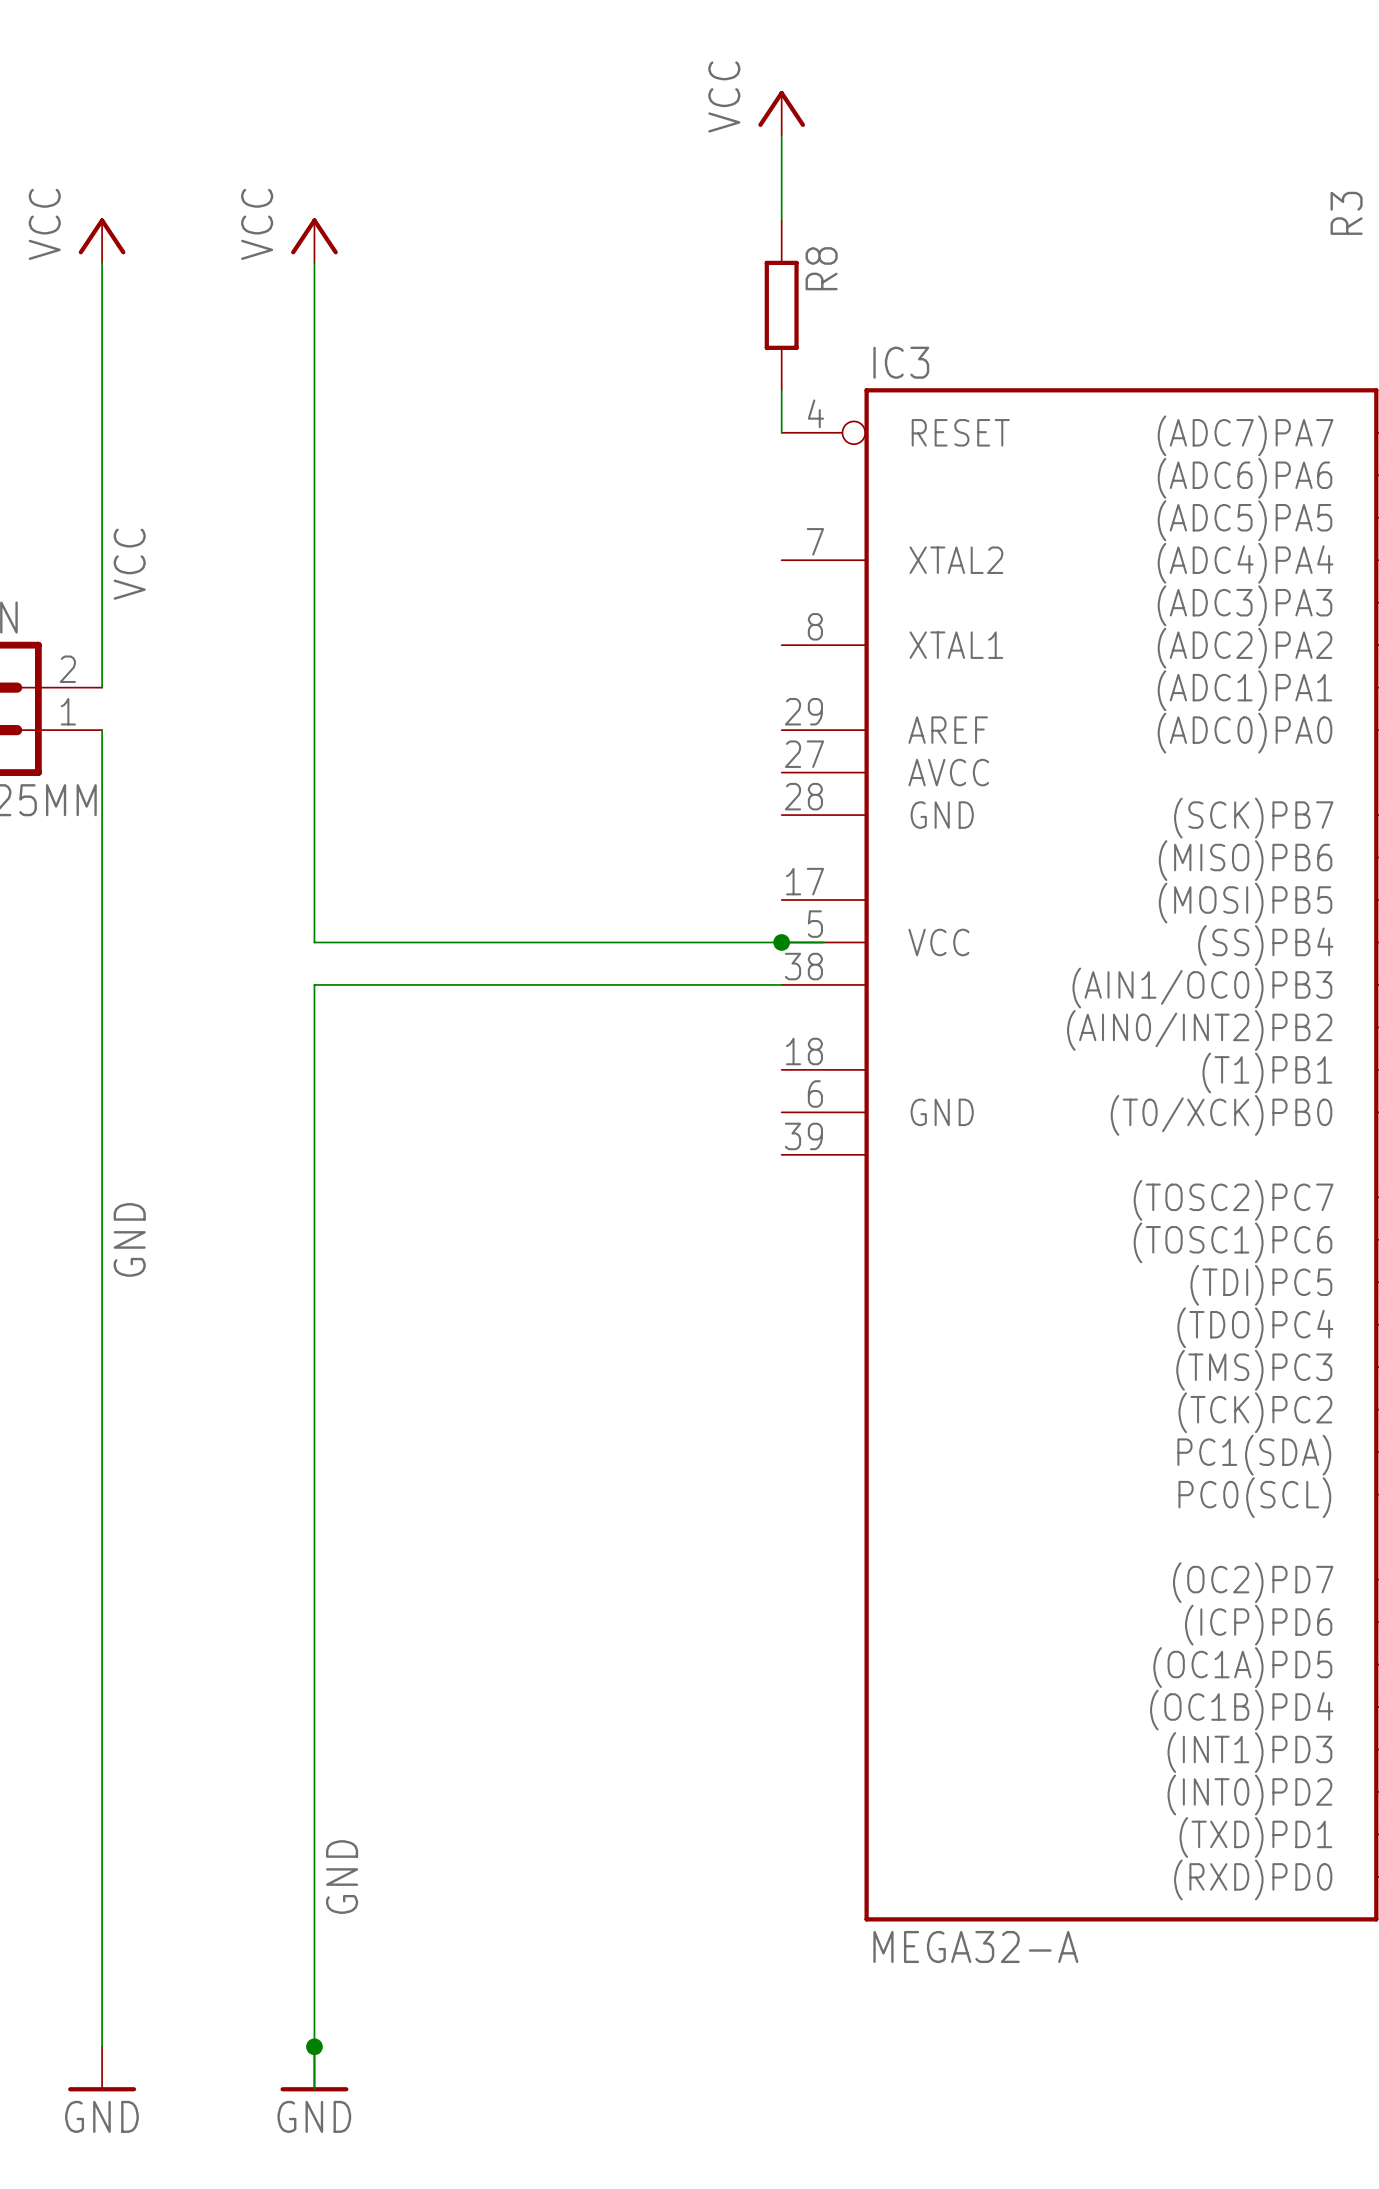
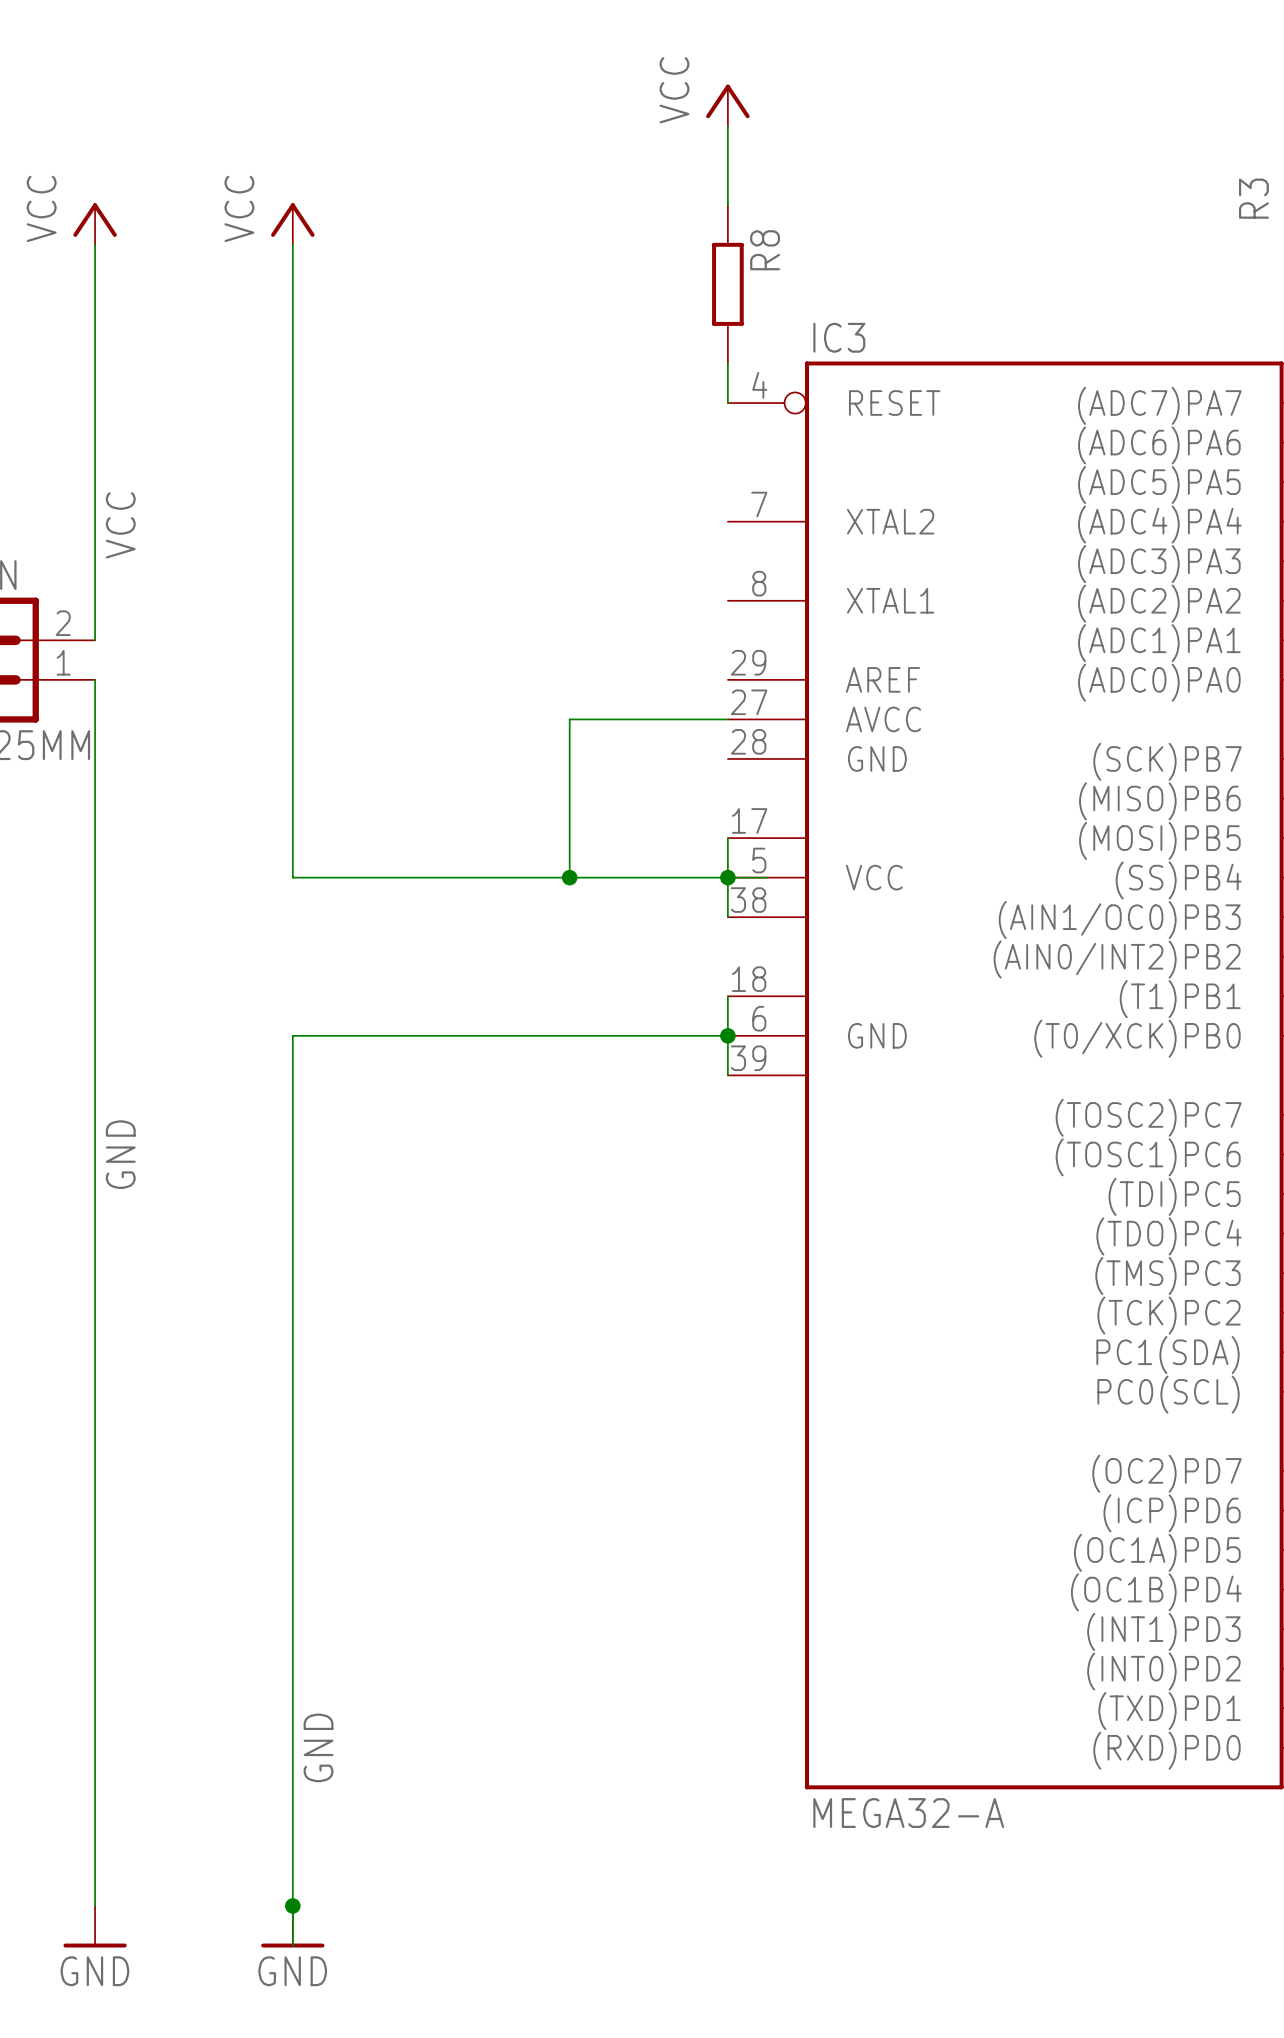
wire: none -> (727, 719) (569, 719) (569, 877)
wire: none -> (727, 838) (727, 917)
junction: none -> (569, 877)
wire: (781, 984) (314, 984) (314, 1112) -> (727, 1035) (292, 1035)
wire: none -> (727, 996) (727, 1075)
junction: none -> (727, 1035)

